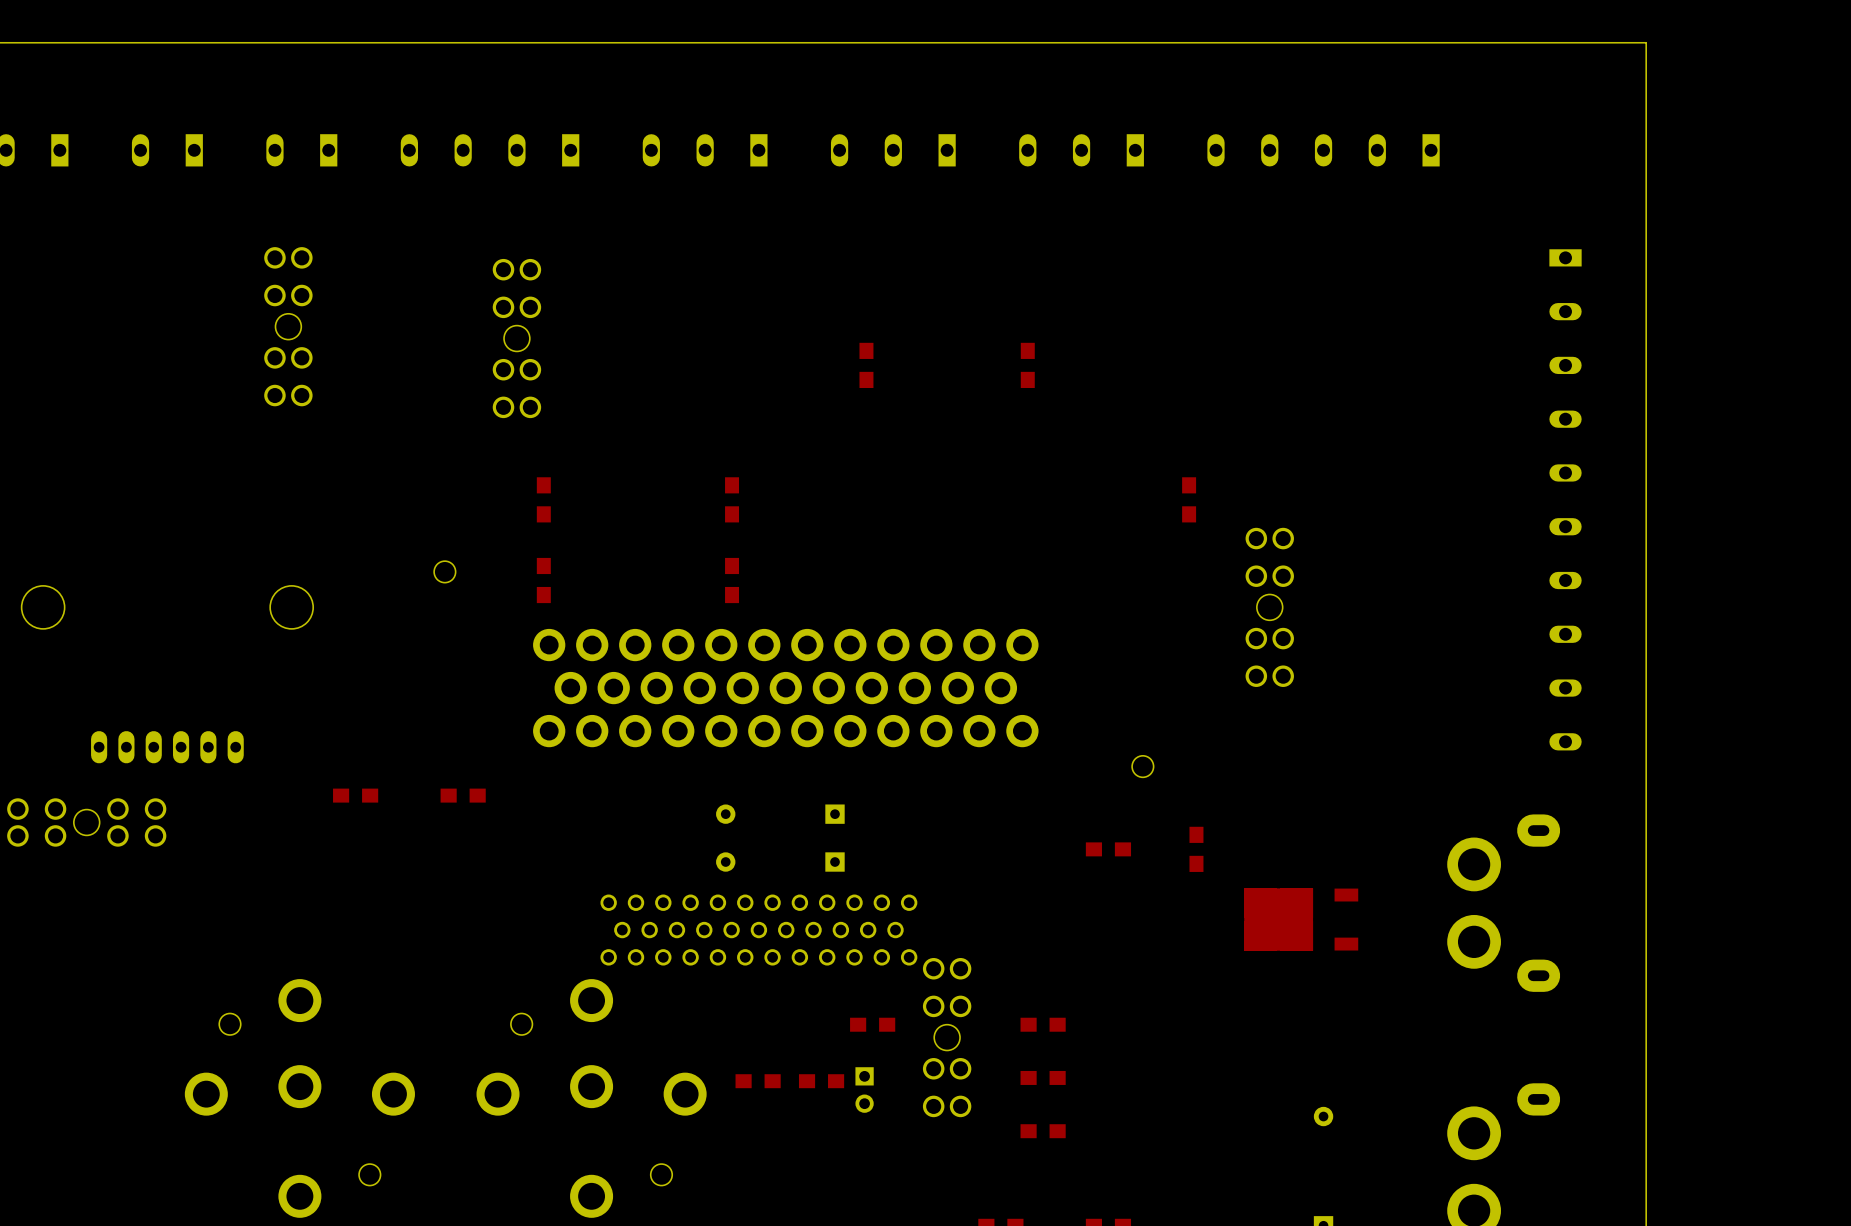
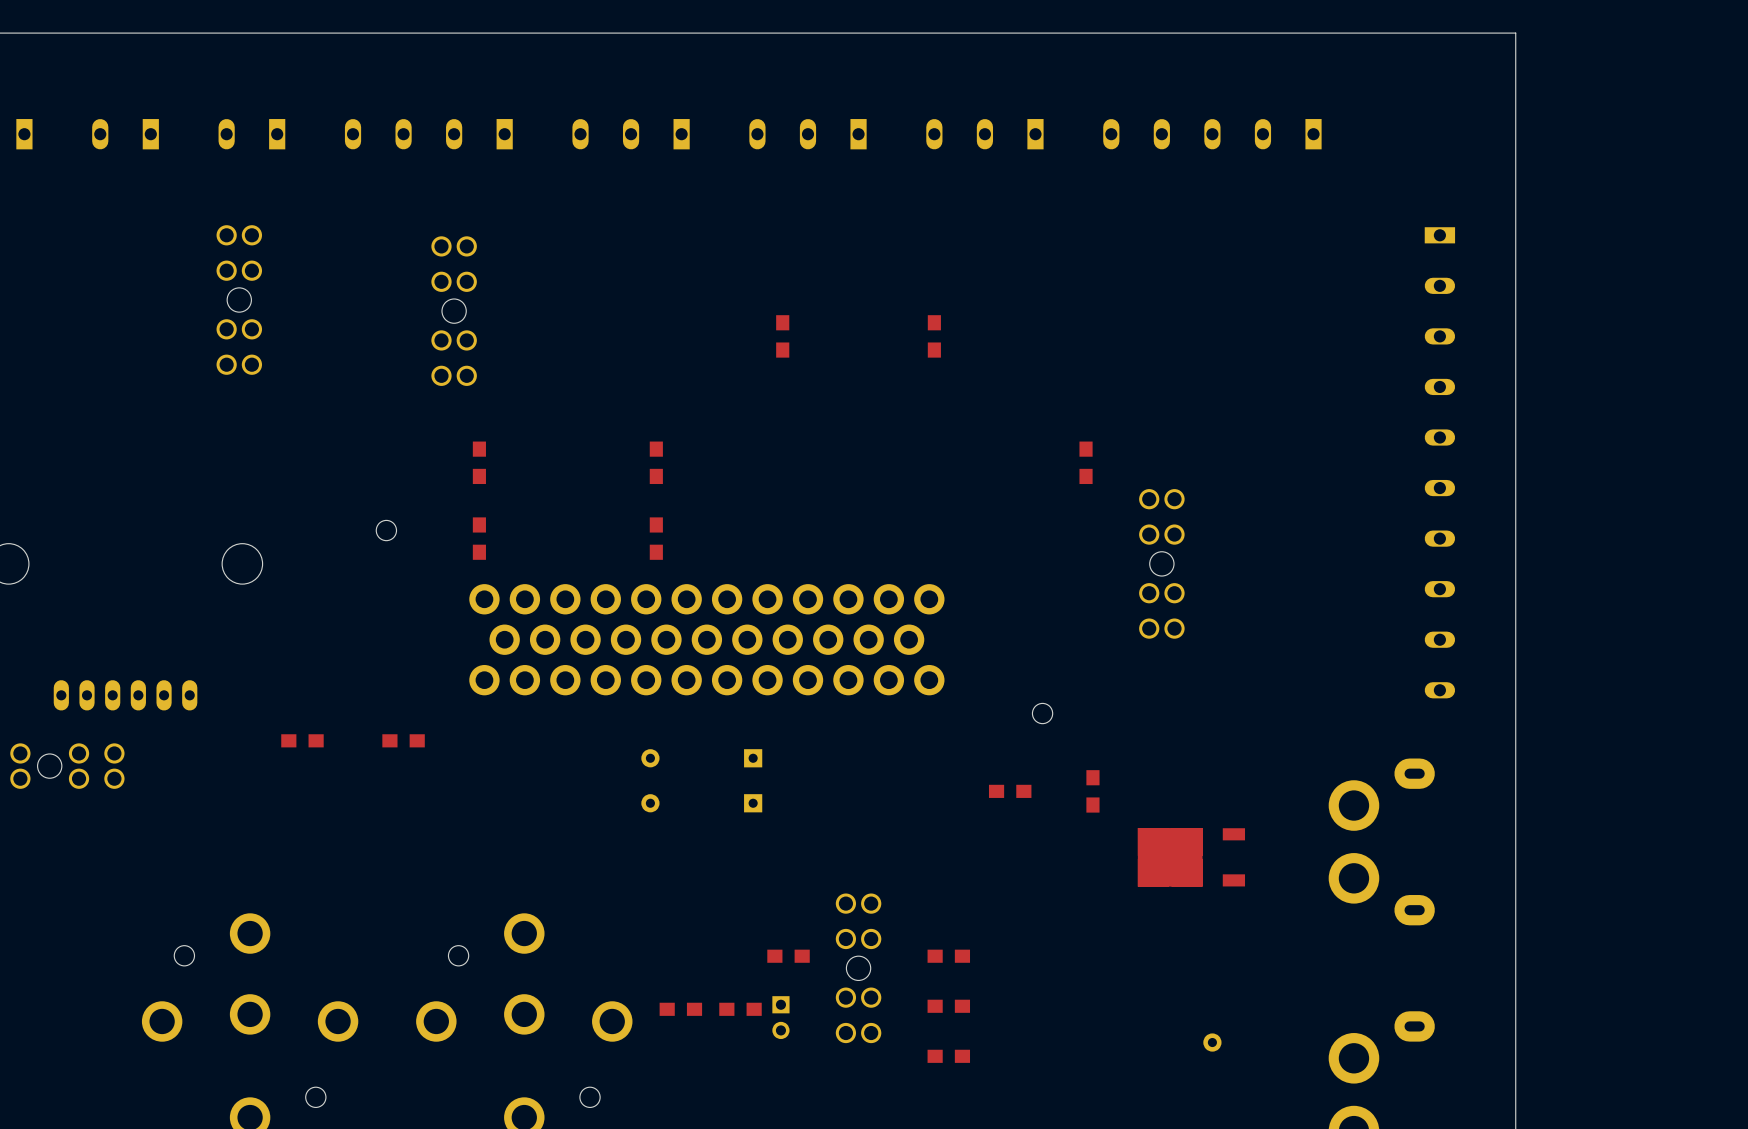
part: (758, 930) -> none

